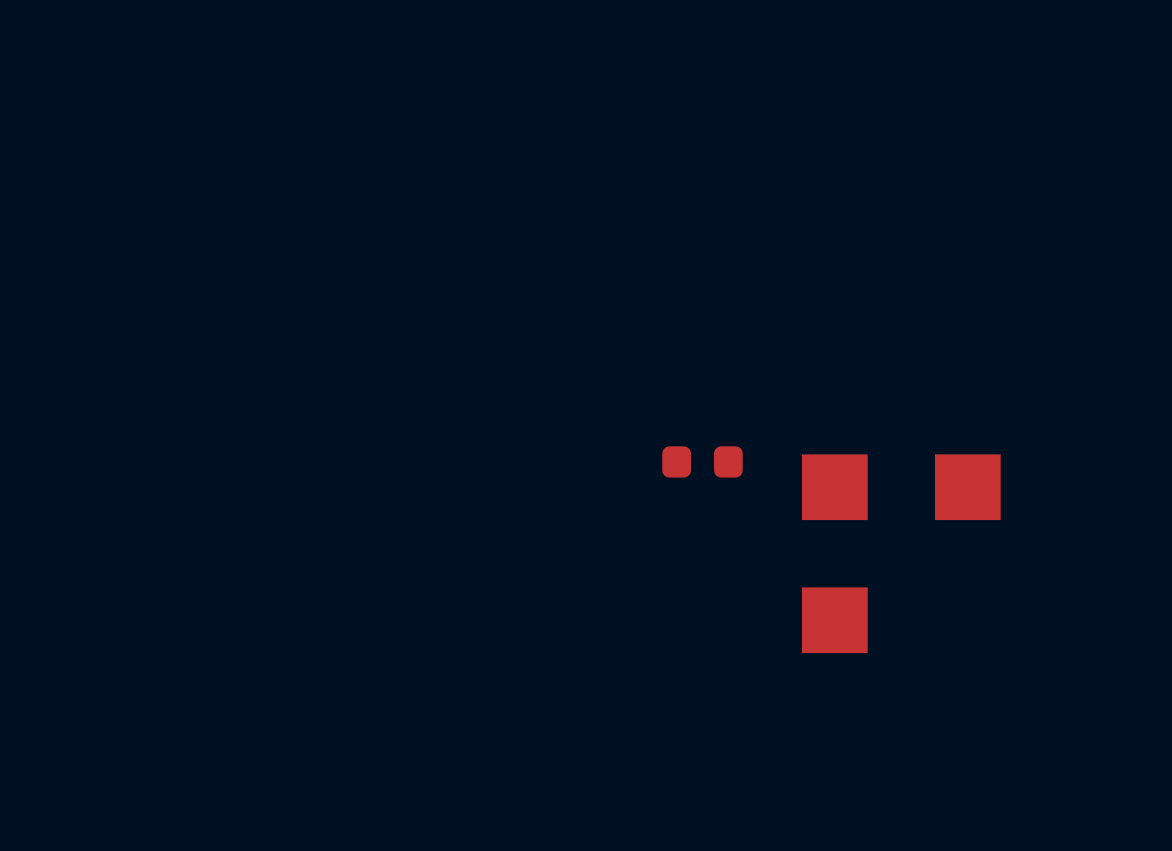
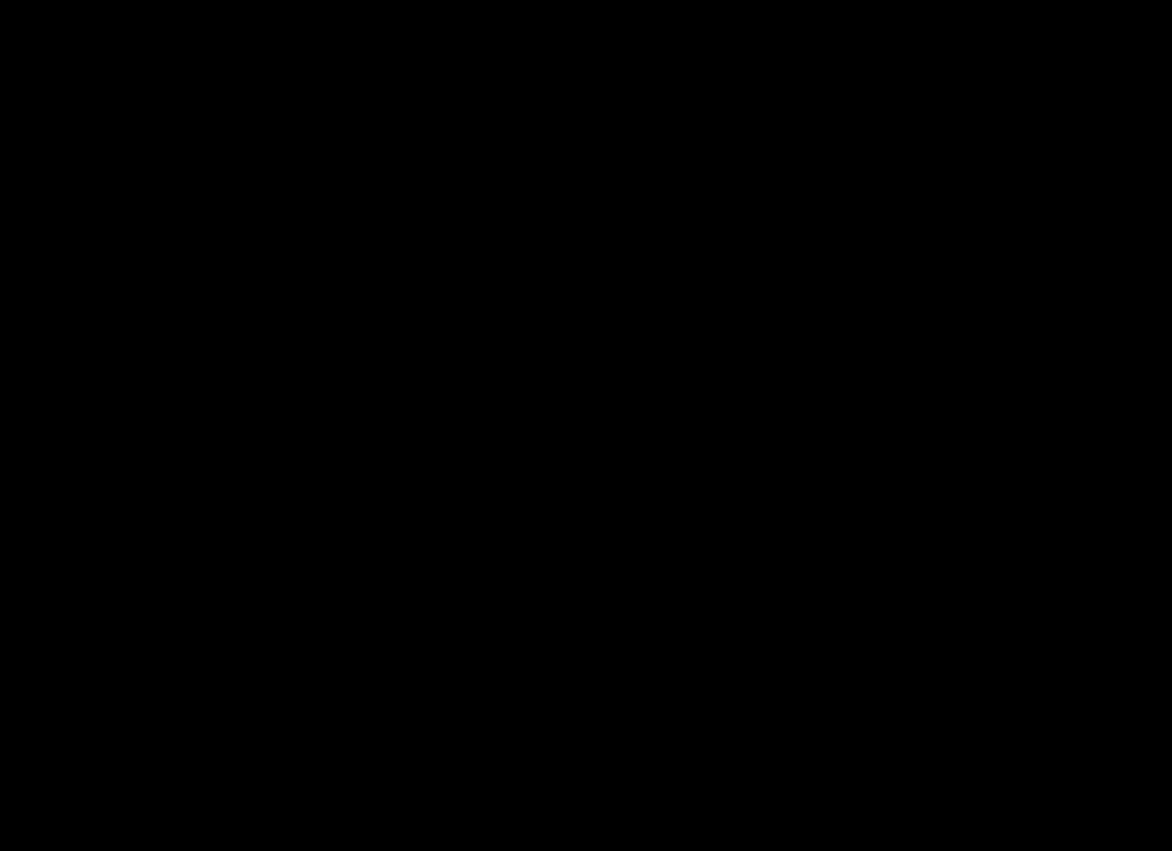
part: (702, 461) -> none
part: (834, 487) -> none
part: (967, 487) -> none
part: (834, 620) -> none

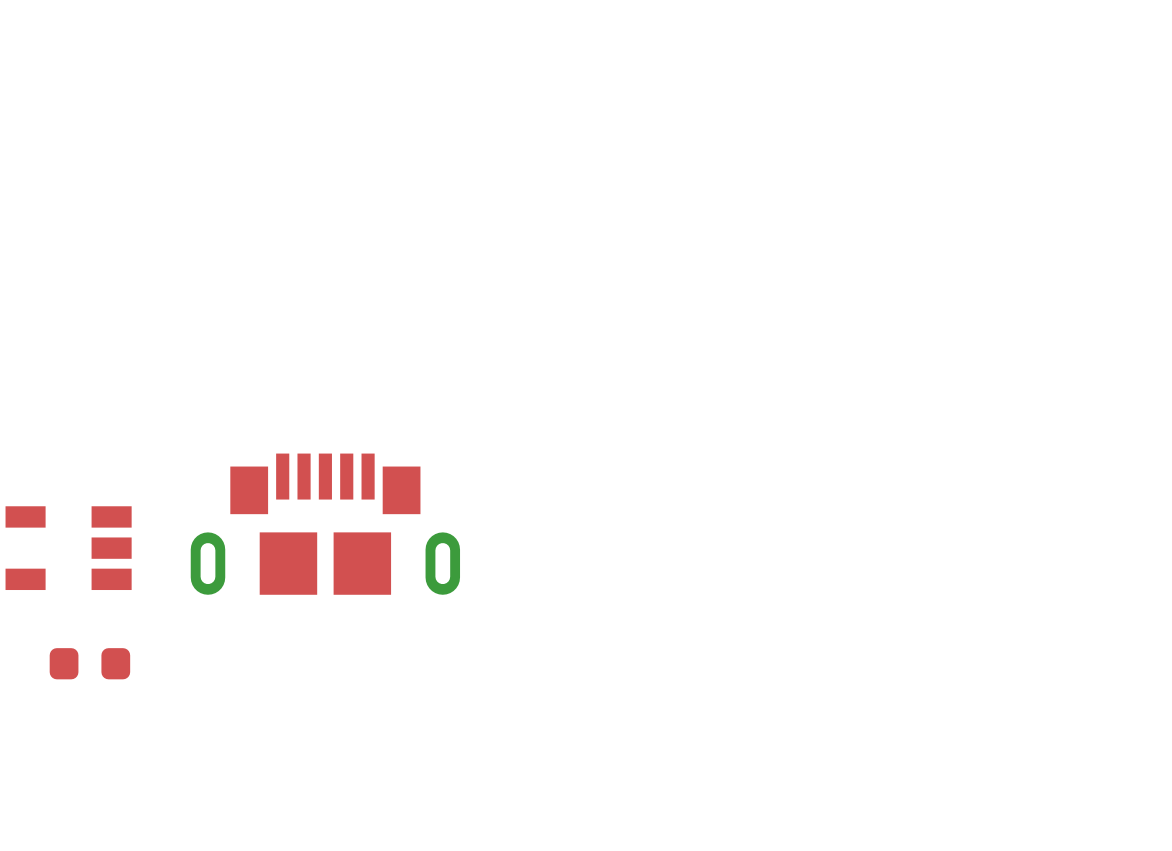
part: none -> (325, 524)
part: none -> (68, 548)
part: none -> (89, 663)

